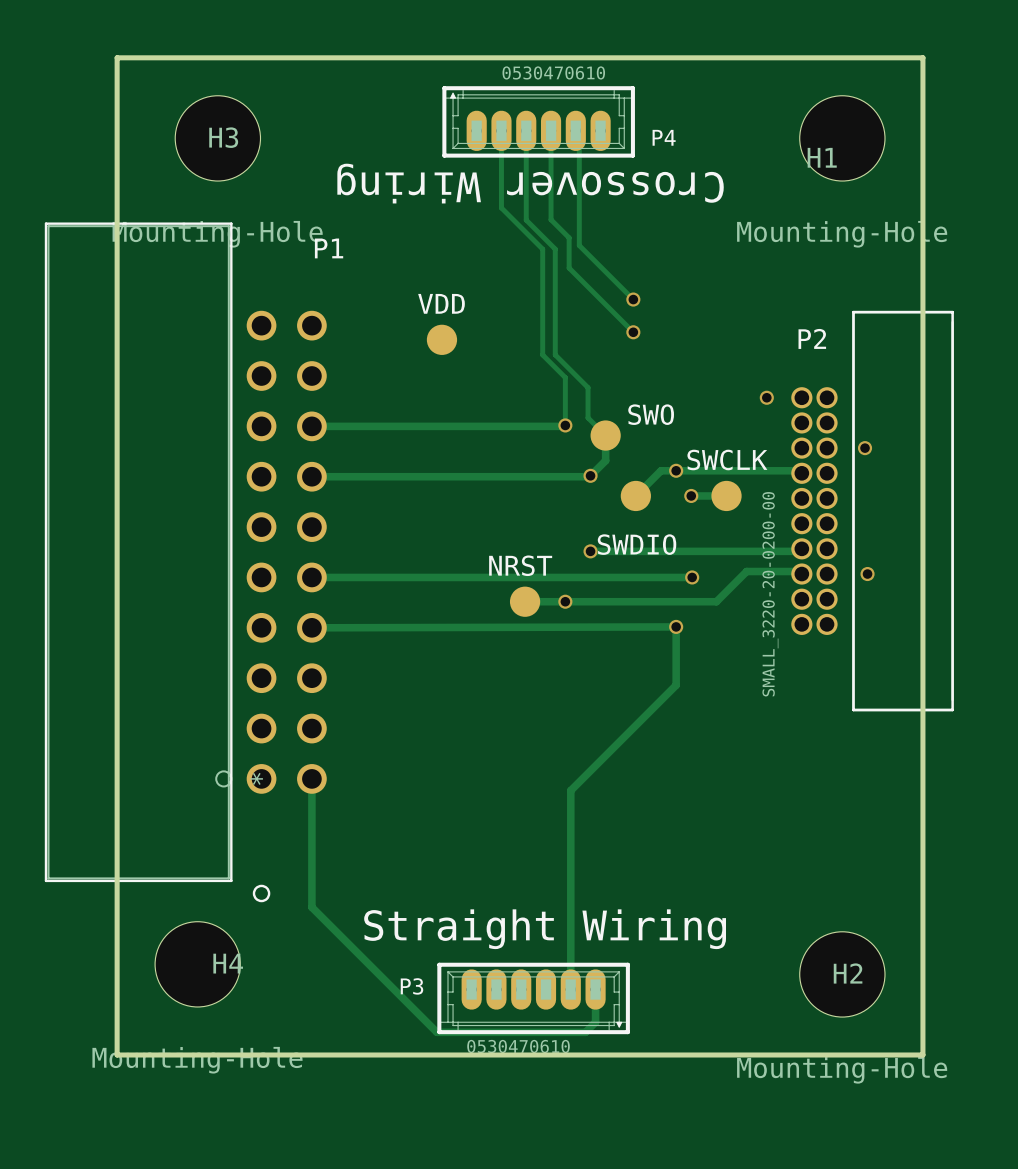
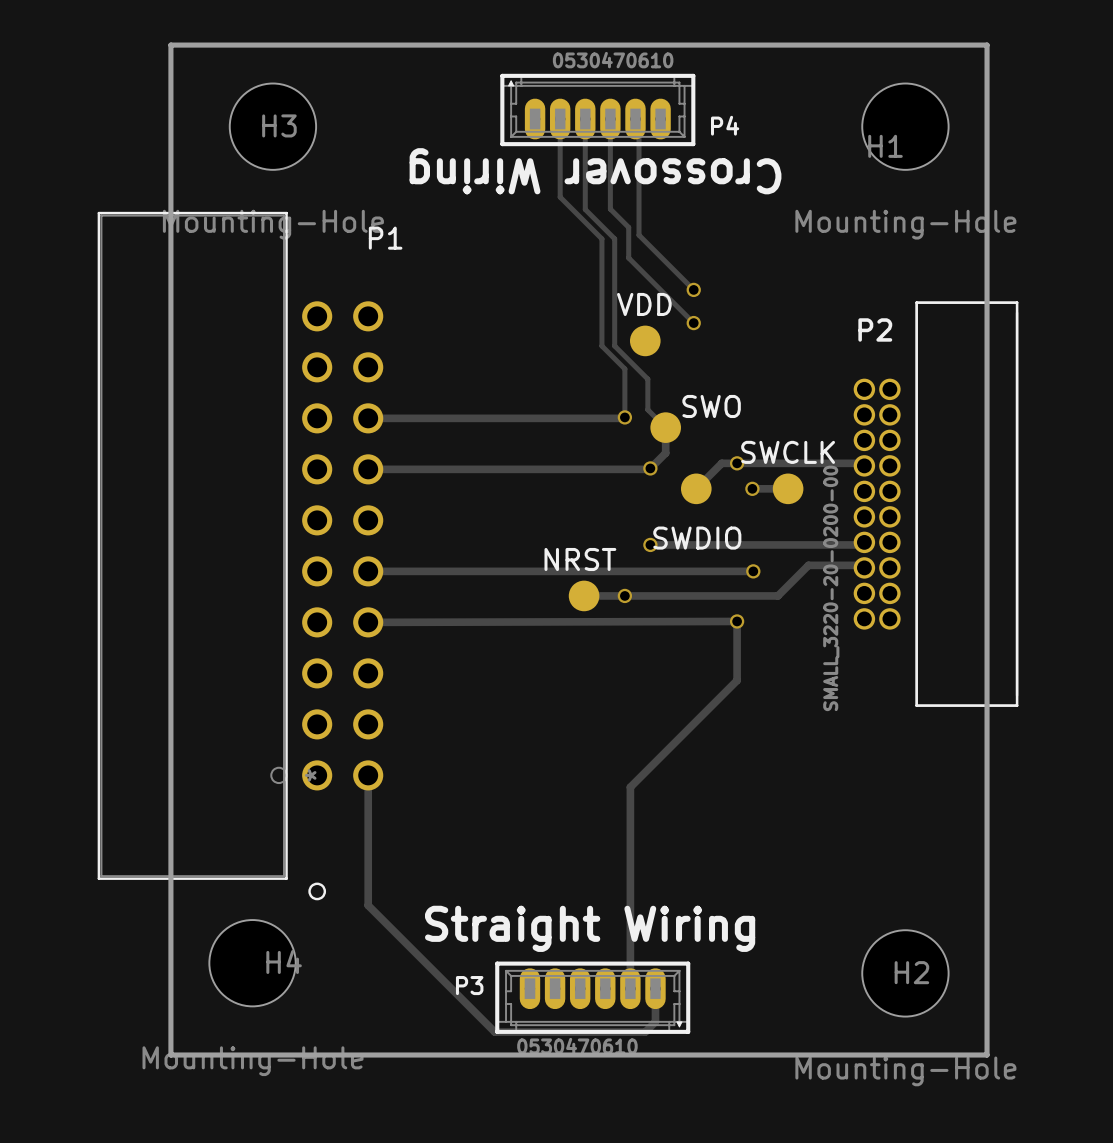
part position: (441, 339) -> (645, 340)
via: (766, 397) -> none
via: (865, 448) -> none
via: (867, 574) -> none

